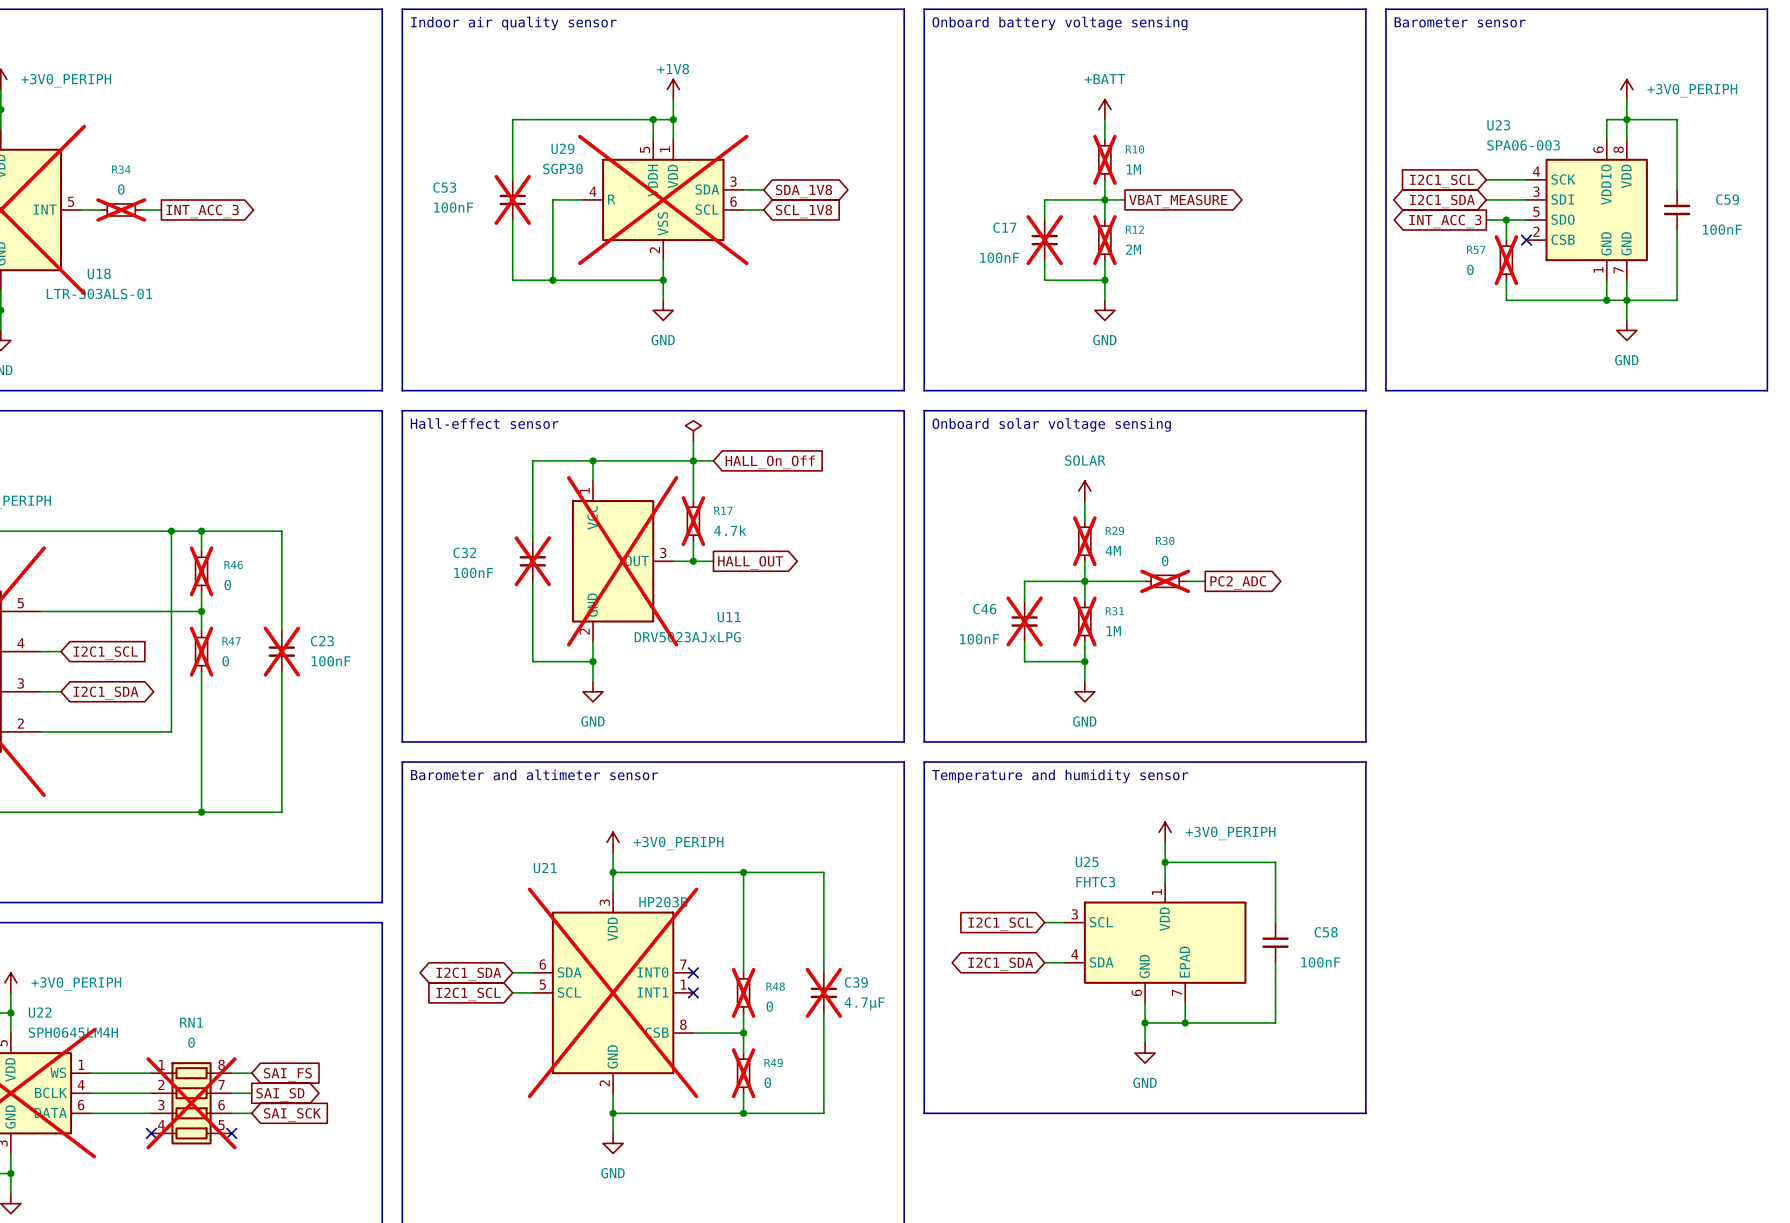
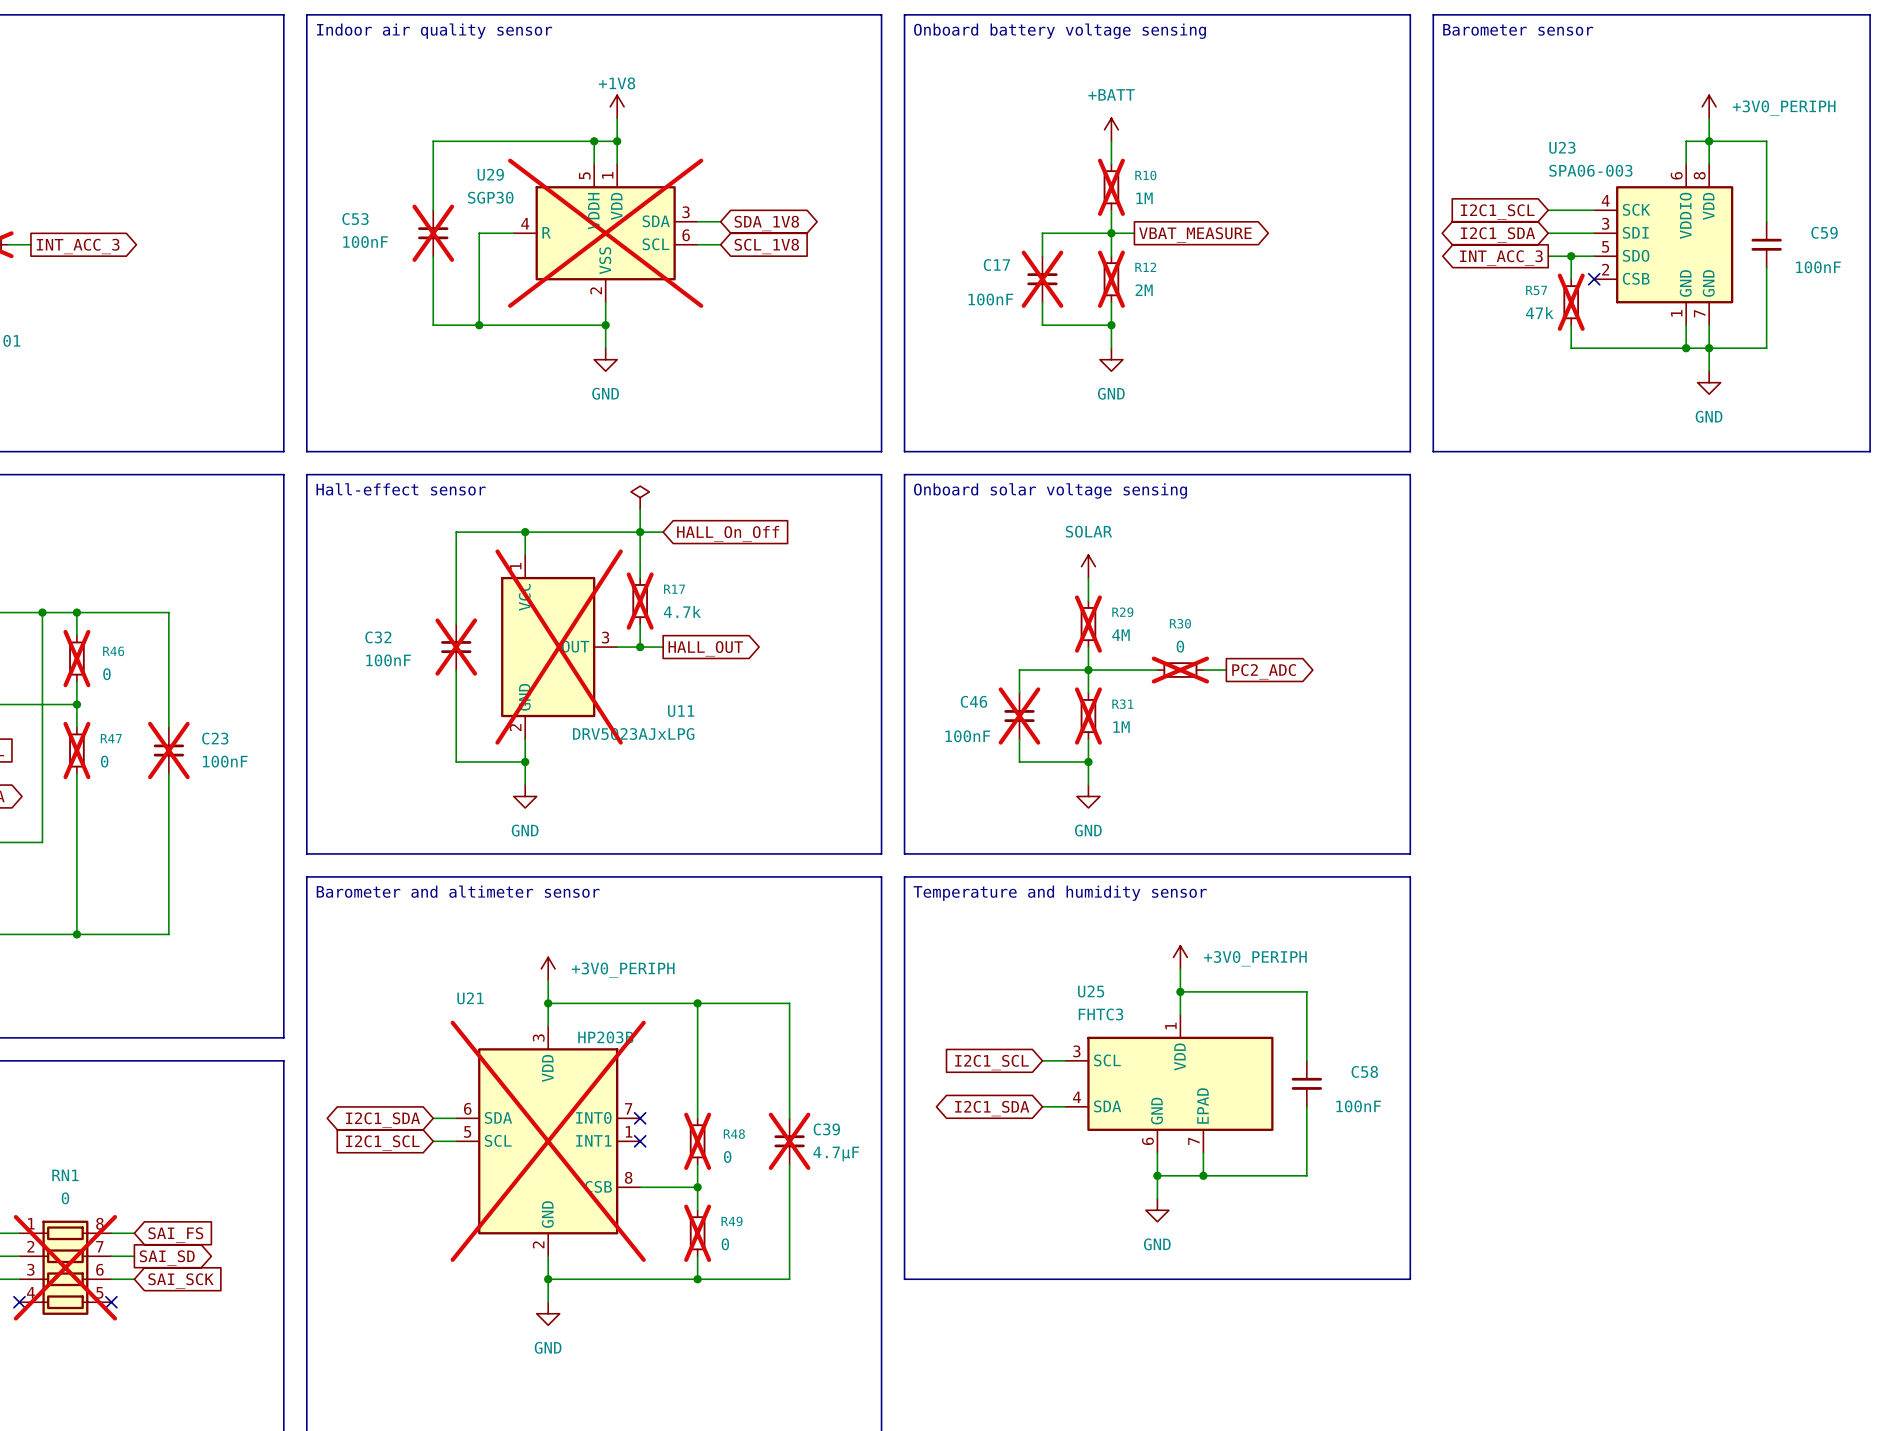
R57 value: 0 (1470, 269) -> 47k (1539, 313)

